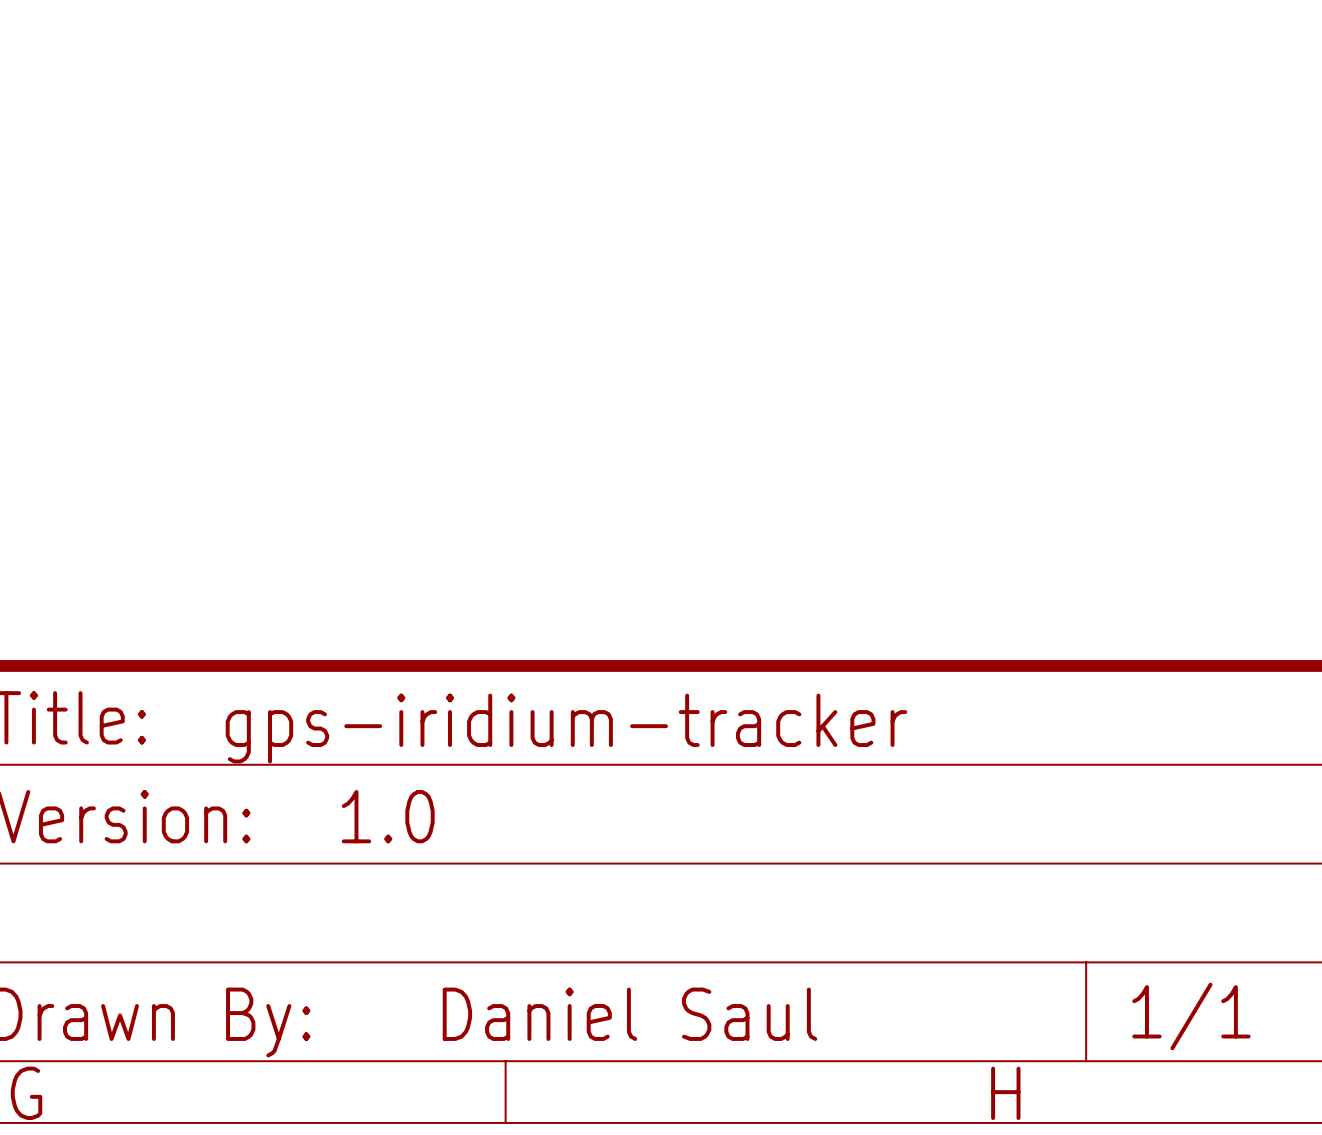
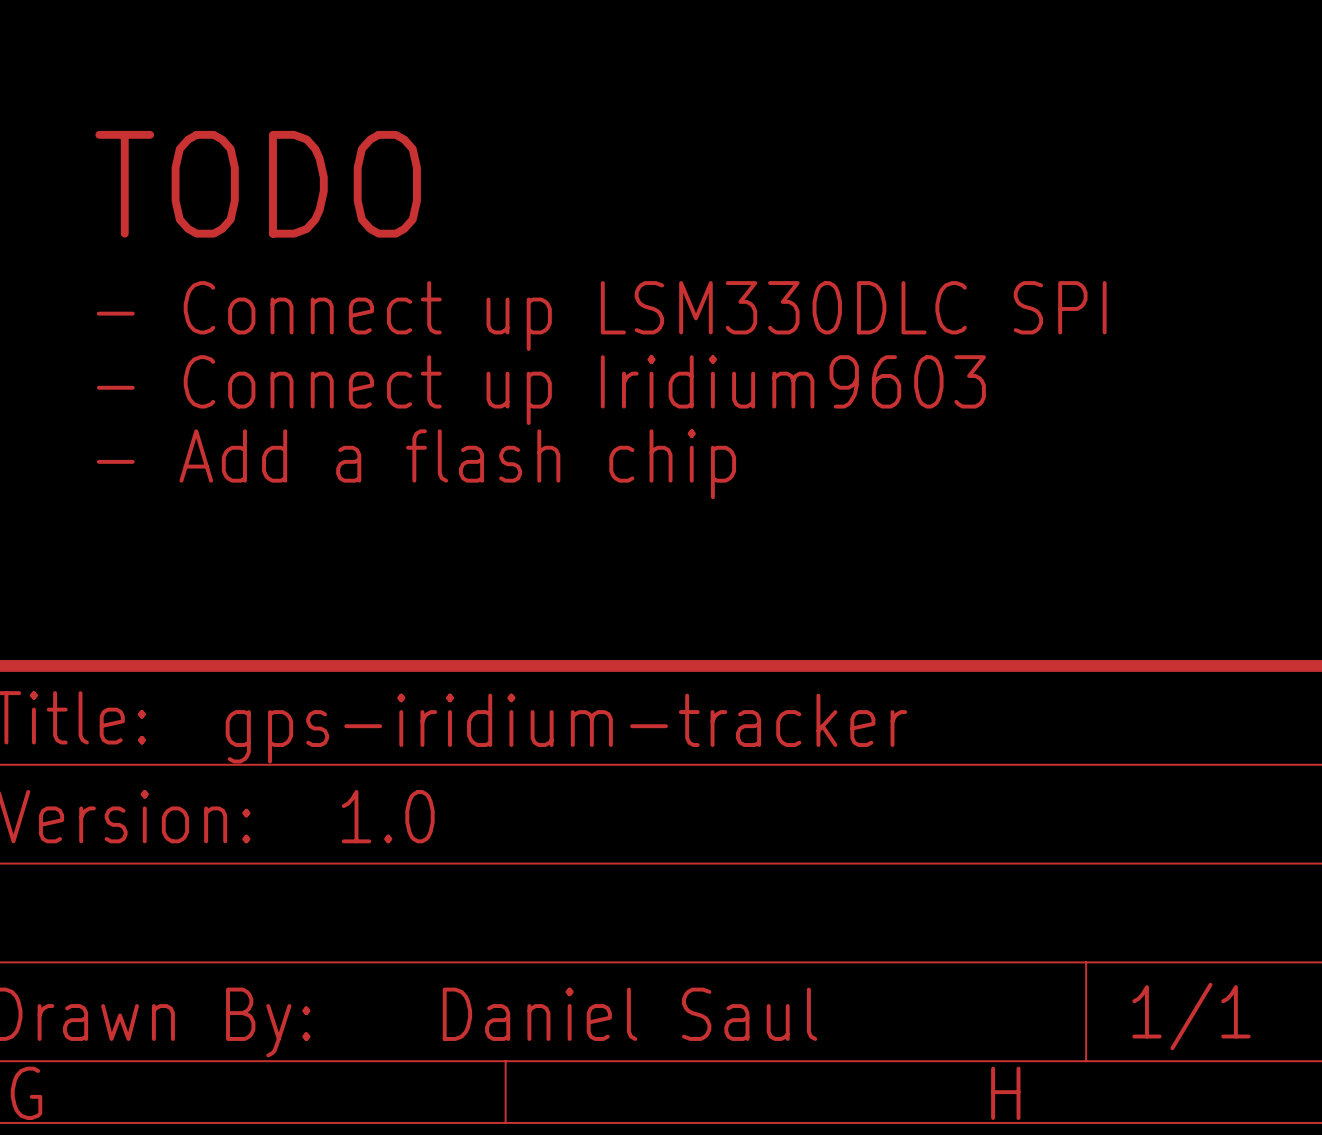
text: none -> TODO (258, 184)
text: none -> - Connect up LSM330DLC SPI (601, 316)
text: none -> - Connect up Iridium9603 (541, 390)
text: none -> - Add a flash chip (416, 464)

